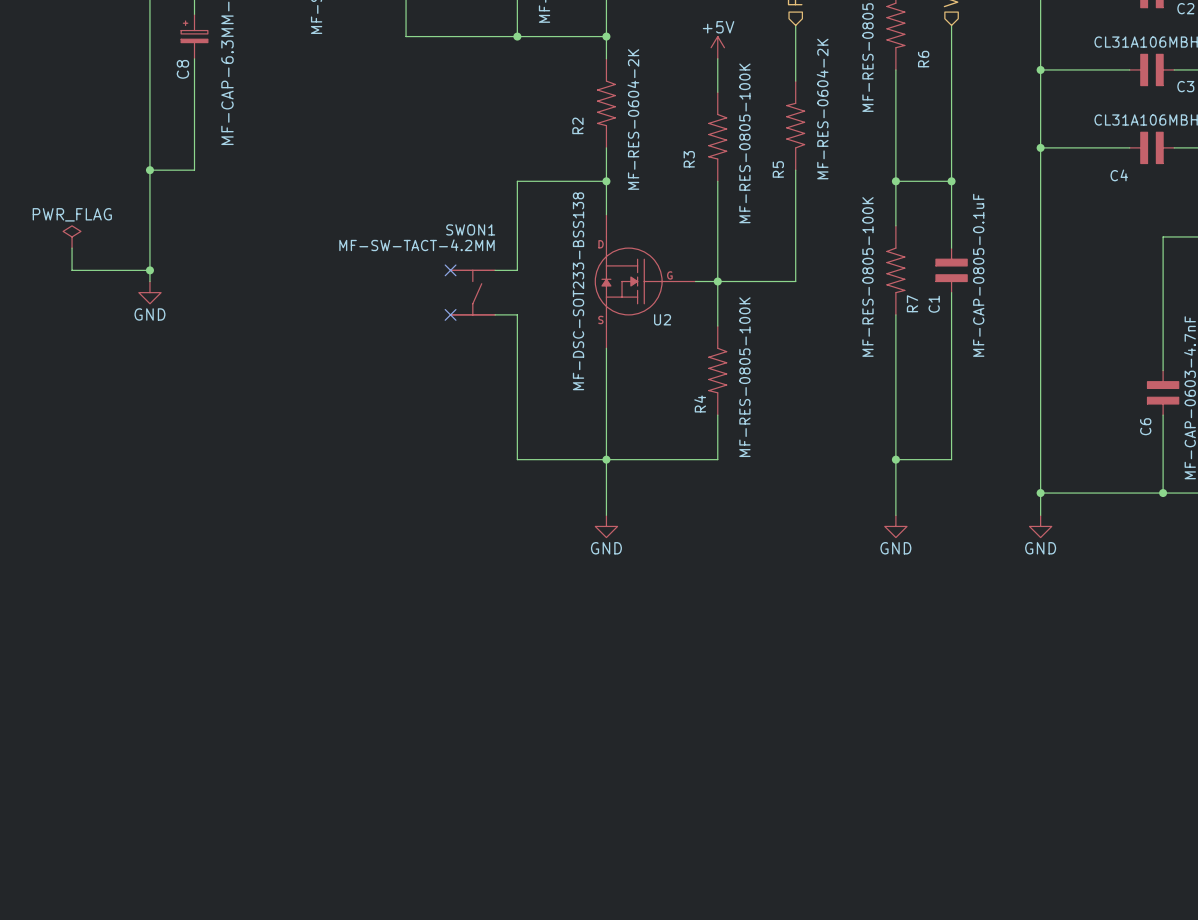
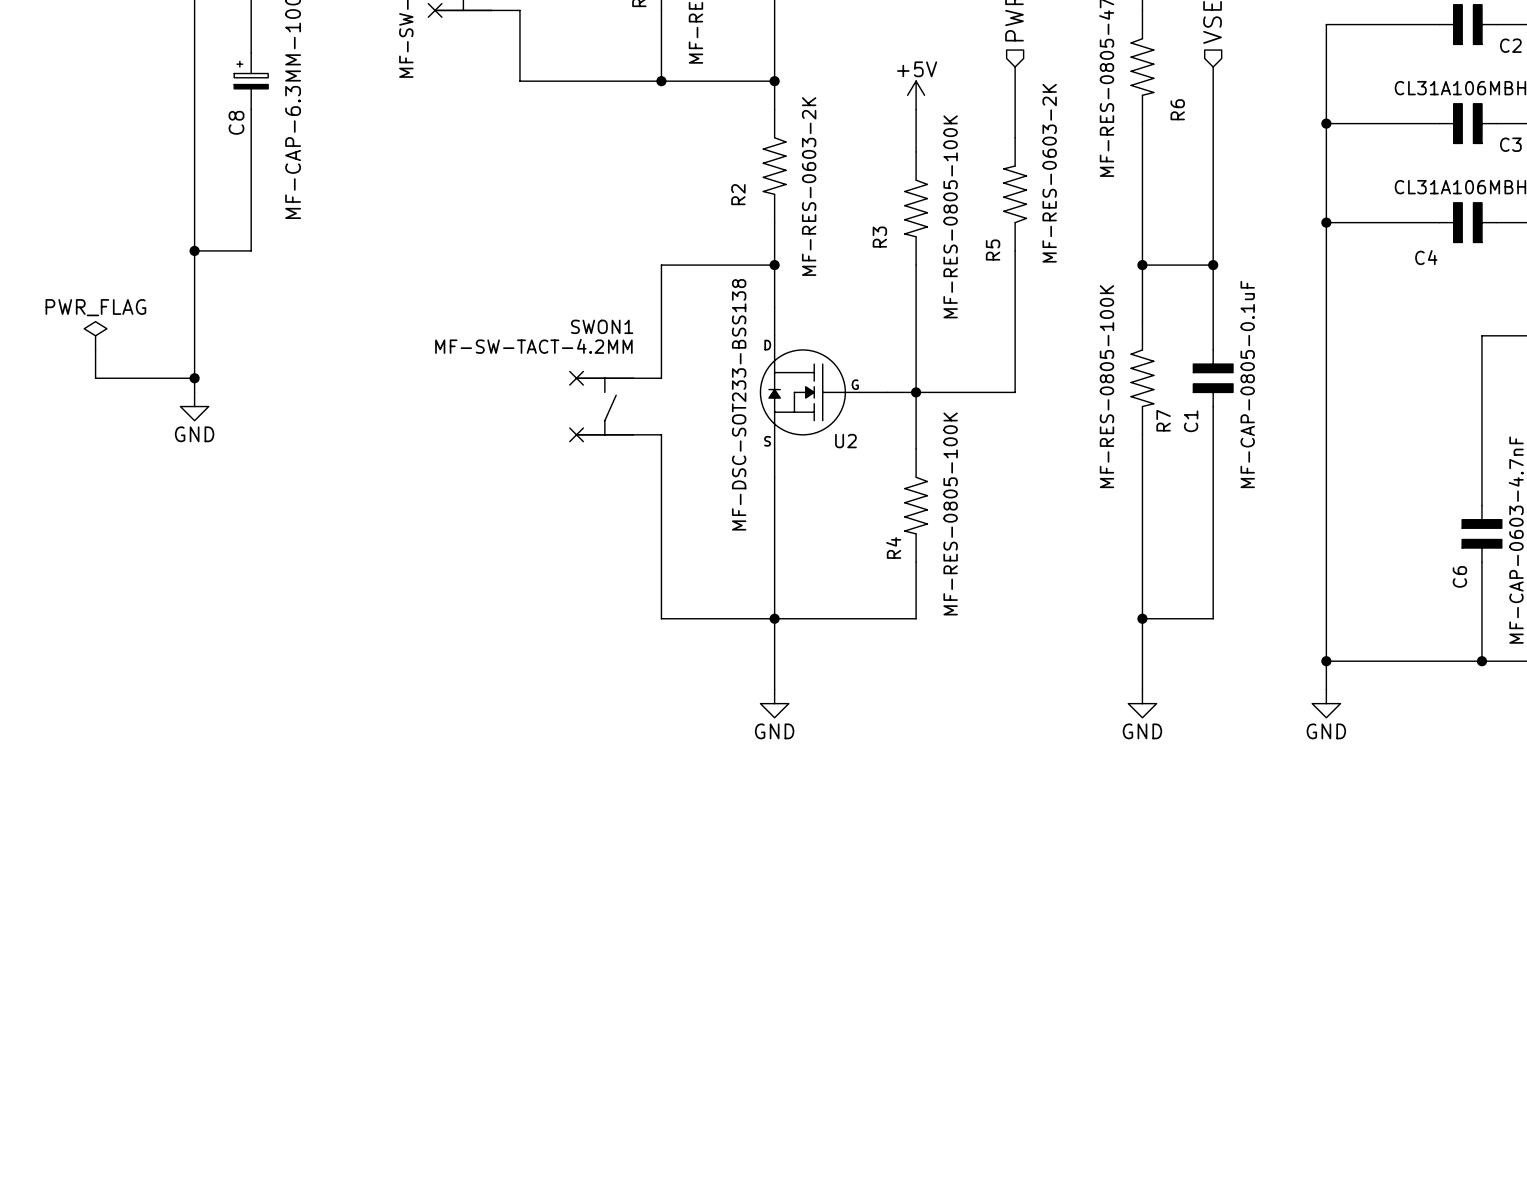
R5 value: MF-RES-0604-2K (822, 109) -> MF-RES-0603-2K (1049, 173)
R2 value: MF-RES-0604-2K (633, 119) -> MF-RES-0603-2K (809, 186)

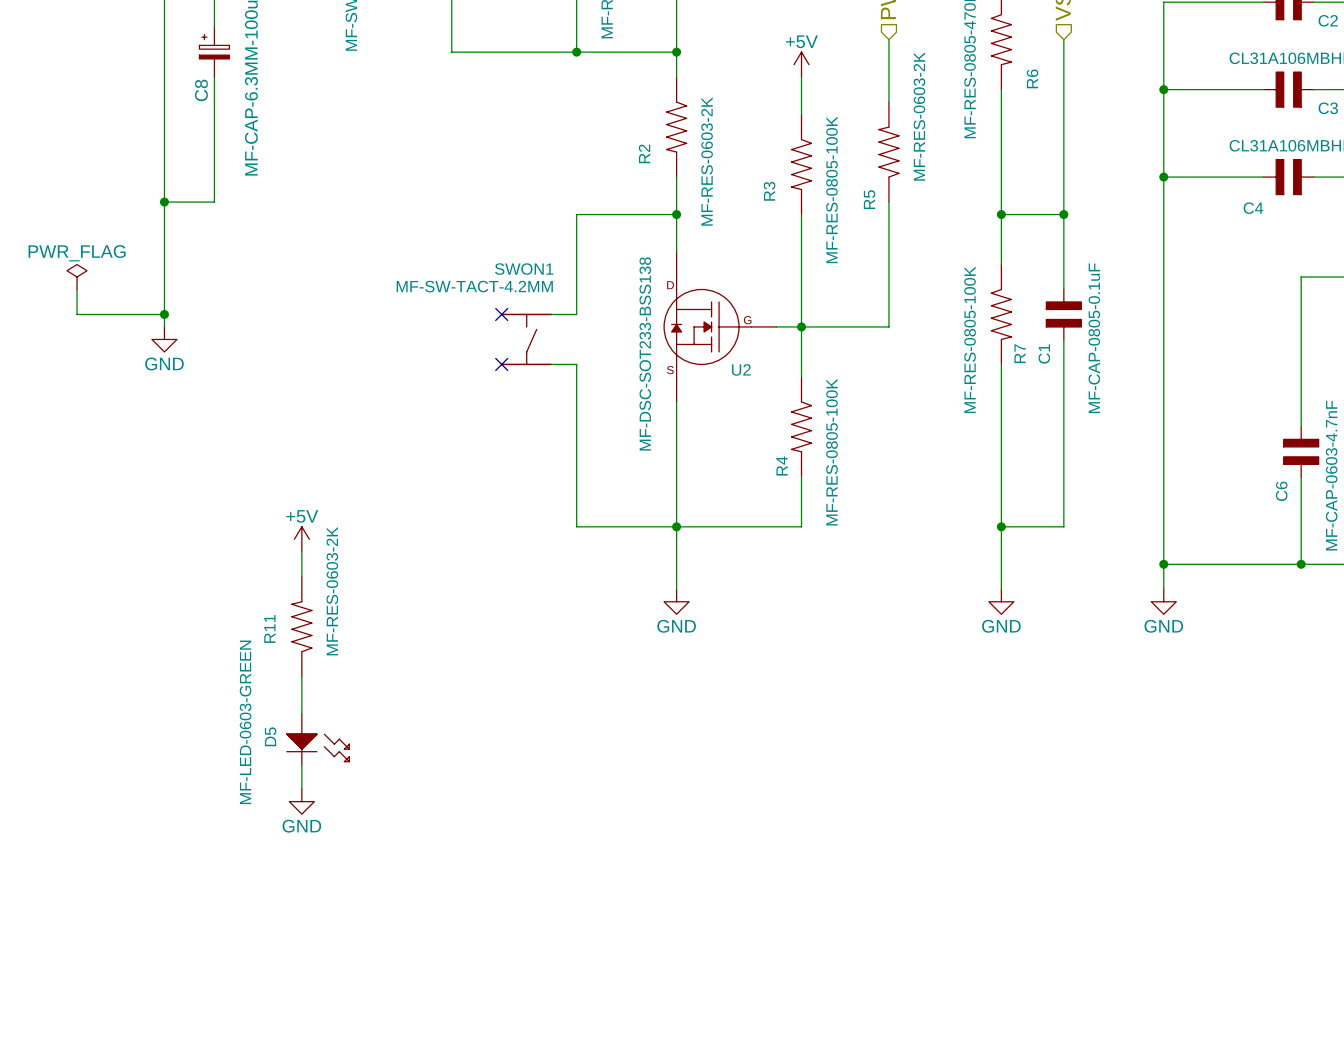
power symbol: none -> +5V (301, 539)
wire: none -> (301, 551) (301, 576)
R11: none -> MF-RES-0603-2K (301, 626)
wire: none -> (301, 676) (301, 714)
D5: none -> MF-LED-0603-GREEN (318, 739)
wire: none -> (301, 764) (301, 789)
power symbol: none -> GND (301, 801)

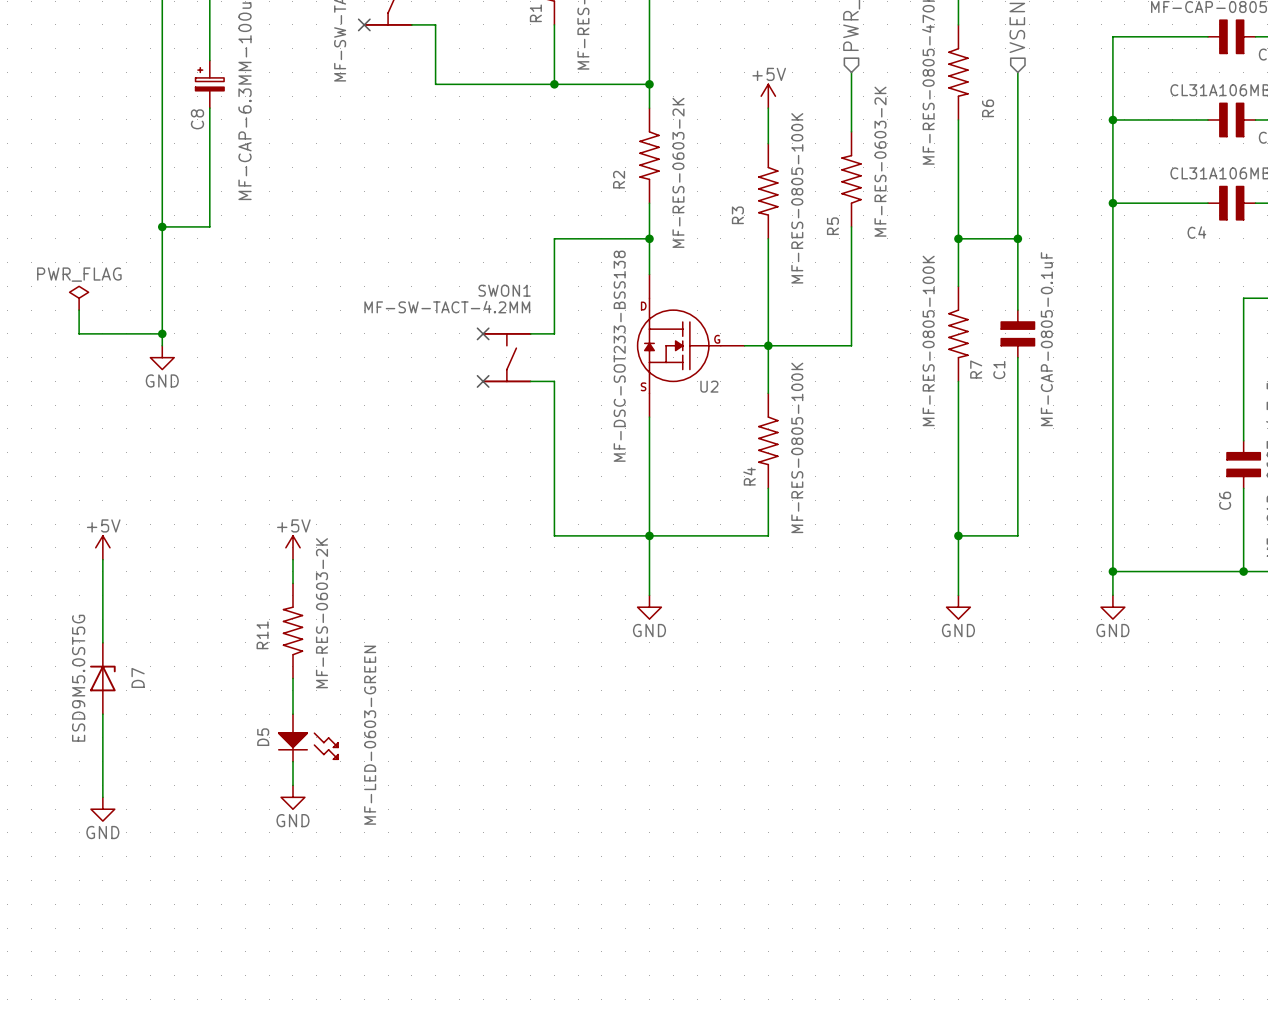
power symbol: none -> +5V (102, 547)
wire: none -> (102, 559) (102, 642)
D7: none -> ESD9M5.0ST5G (102, 678)
wire: none -> (102, 714) (102, 797)
D5 value position: MF-LED-0603-GREEN (245, 722) -> MF-LED-0603-GREEN (370, 735)
power symbol: none -> GND (102, 809)

